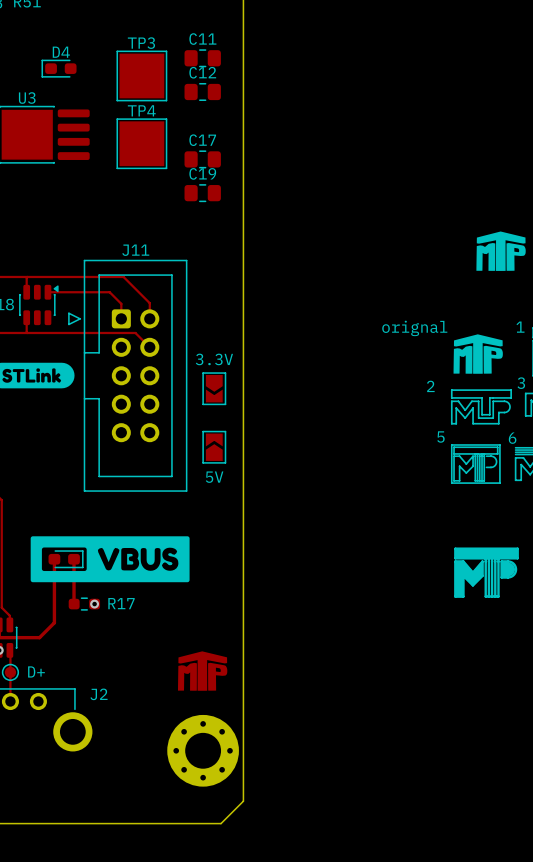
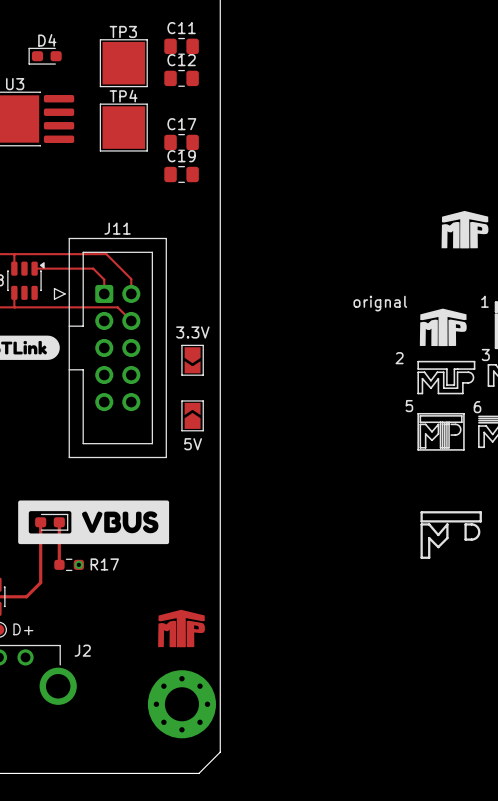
drawing: [454, 547, 519, 598] -> none
line: (485, 558) (485, 596) (498, 596) (498, 558) -> none
line: (488, 558) (488, 596) -> none
line: (495, 558) (495, 596) -> none
line: (492, 559) (492, 596) -> none

